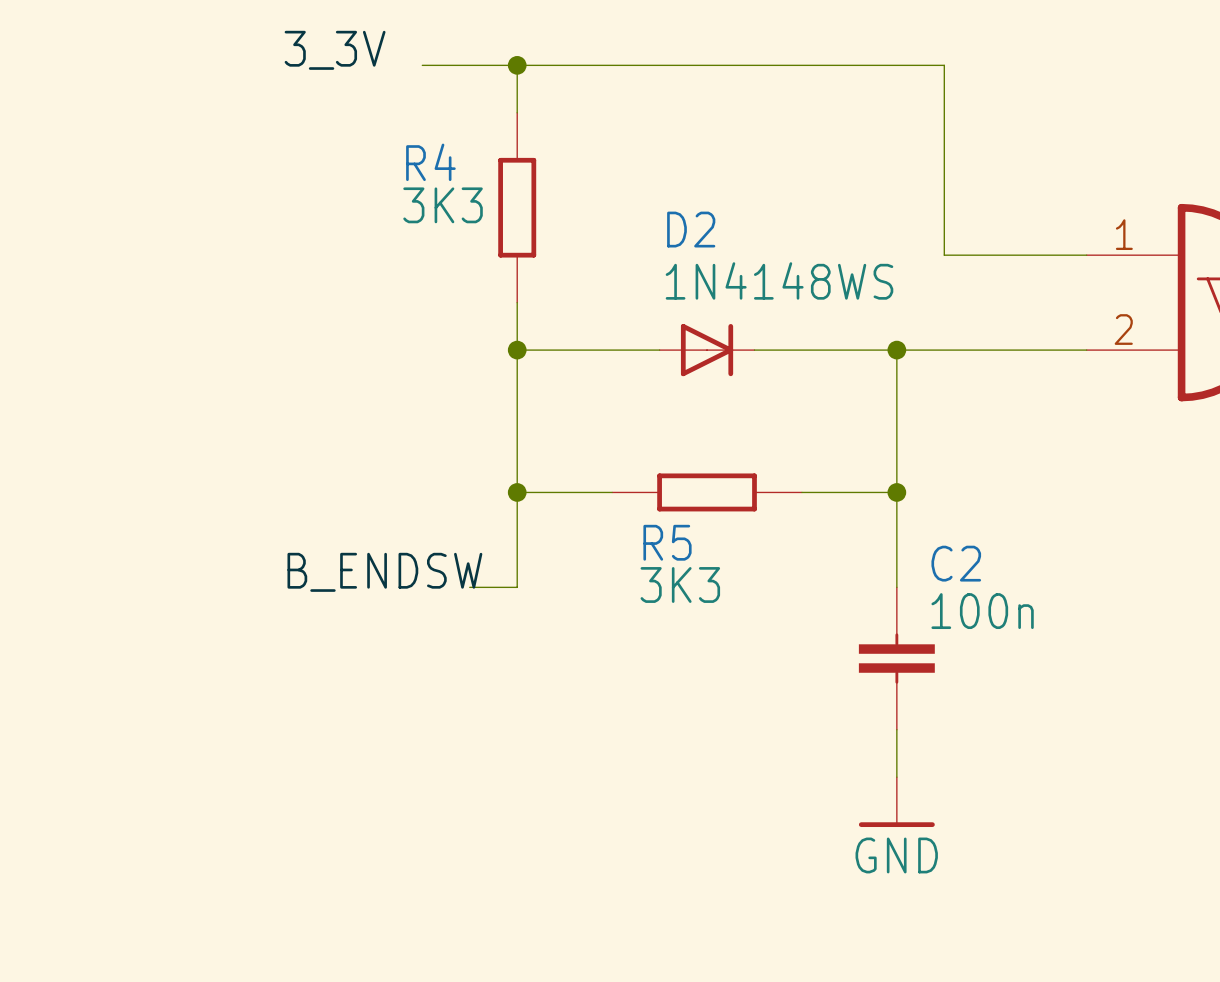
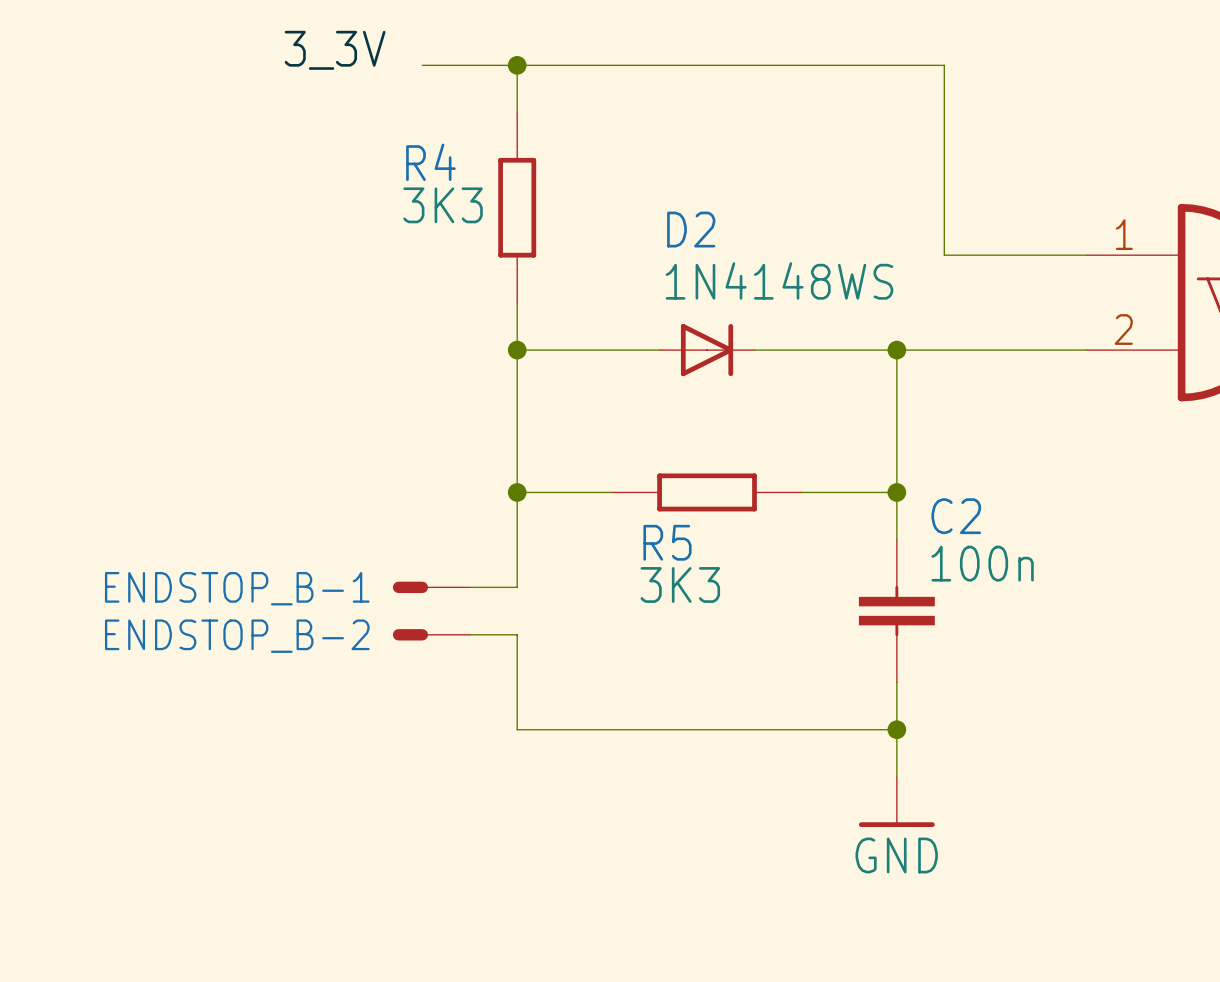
label: B_ENDSW (384, 572) -> none
ENDSTOP_B-1: none -> (431, 587)
ENDSTOP_B-2: none -> (431, 634)
wire: none -> (469, 634) (517, 634) (517, 729) (896, 729) (896, 682)
C2 position: (896, 658) -> (896, 611)
junction: none -> (896, 729)

